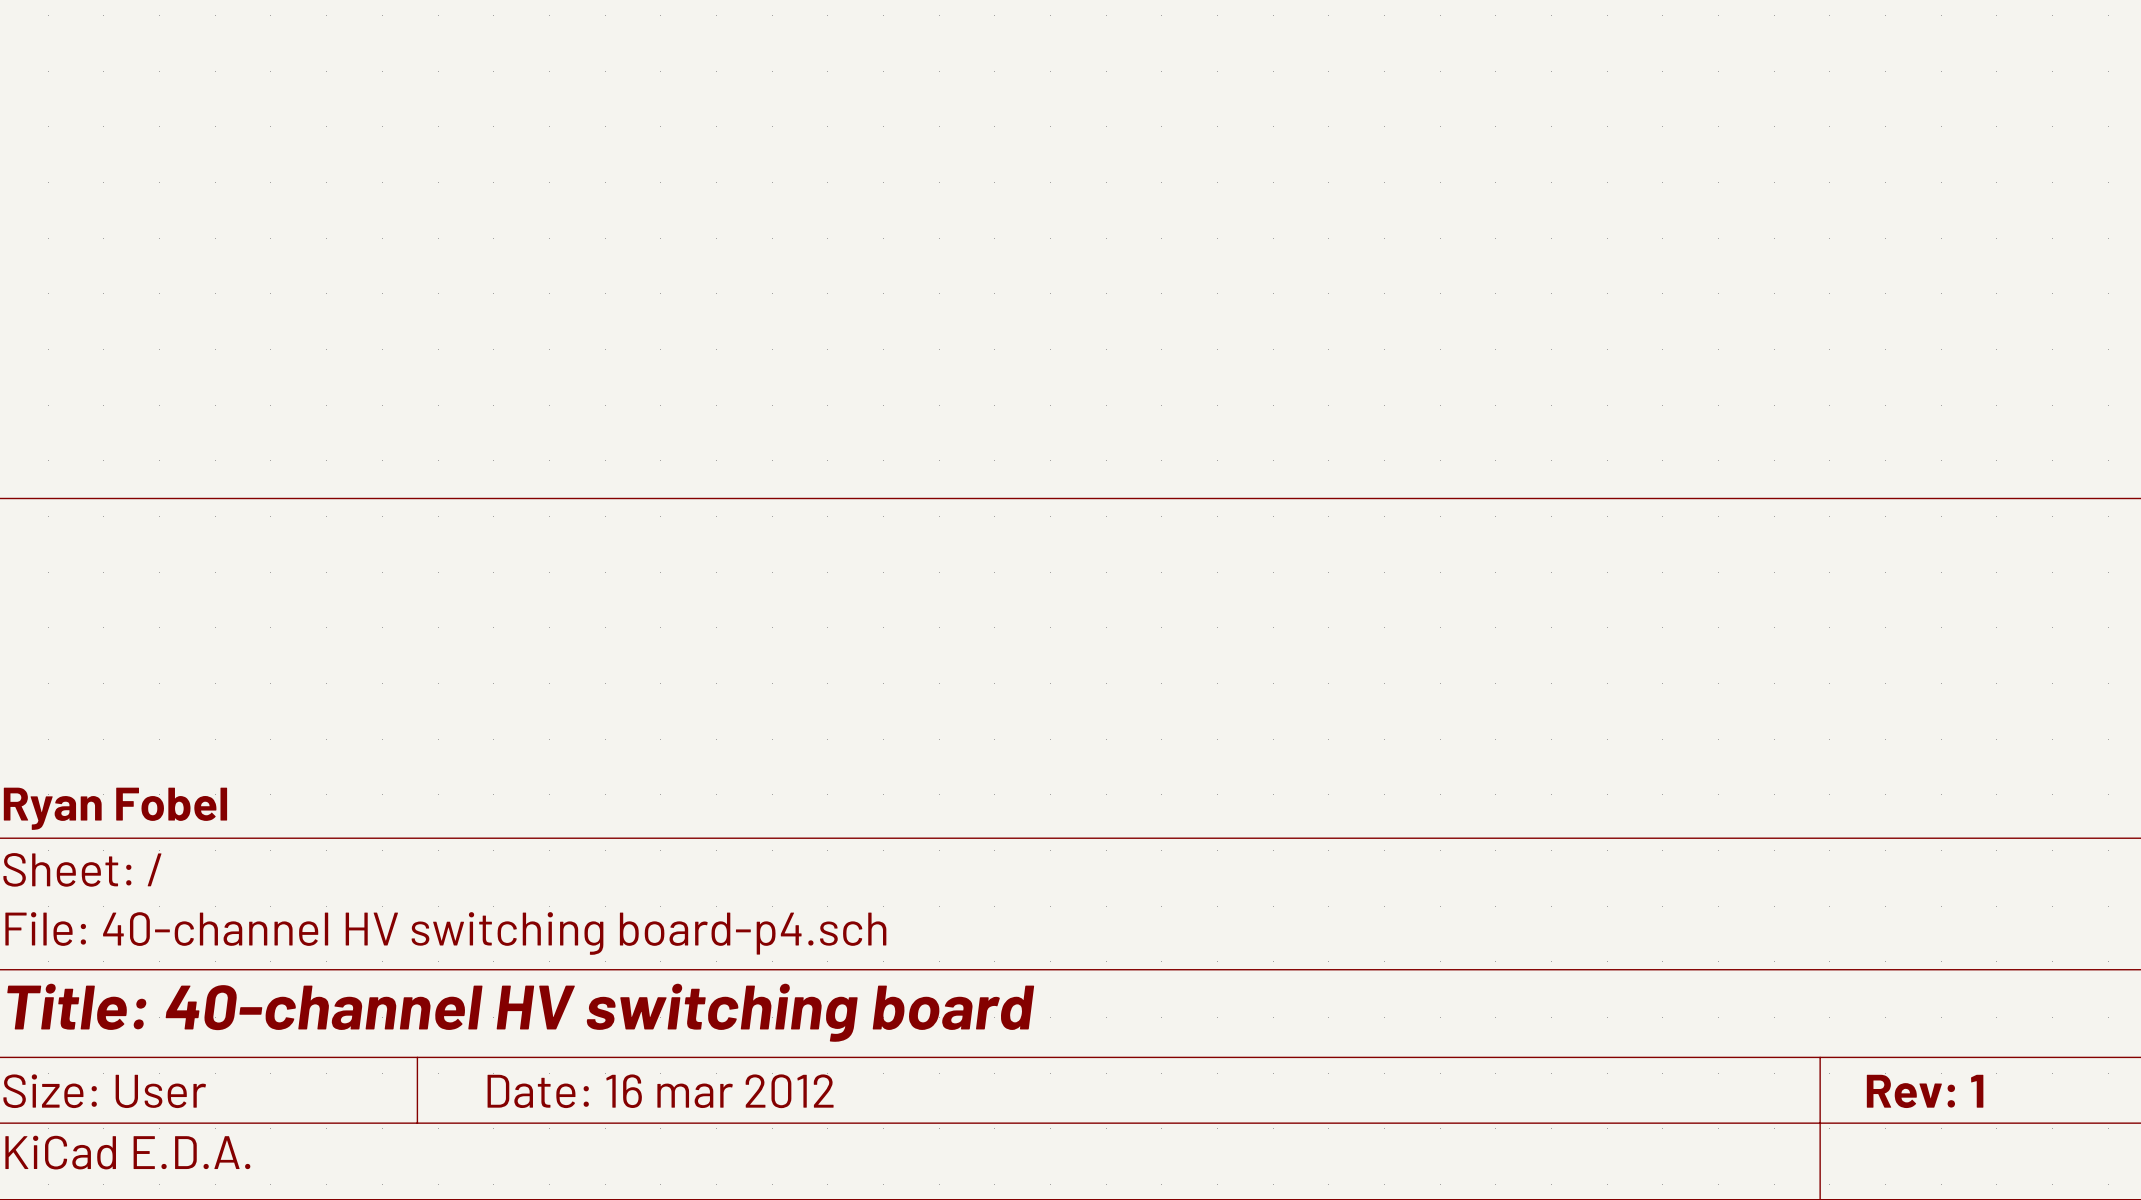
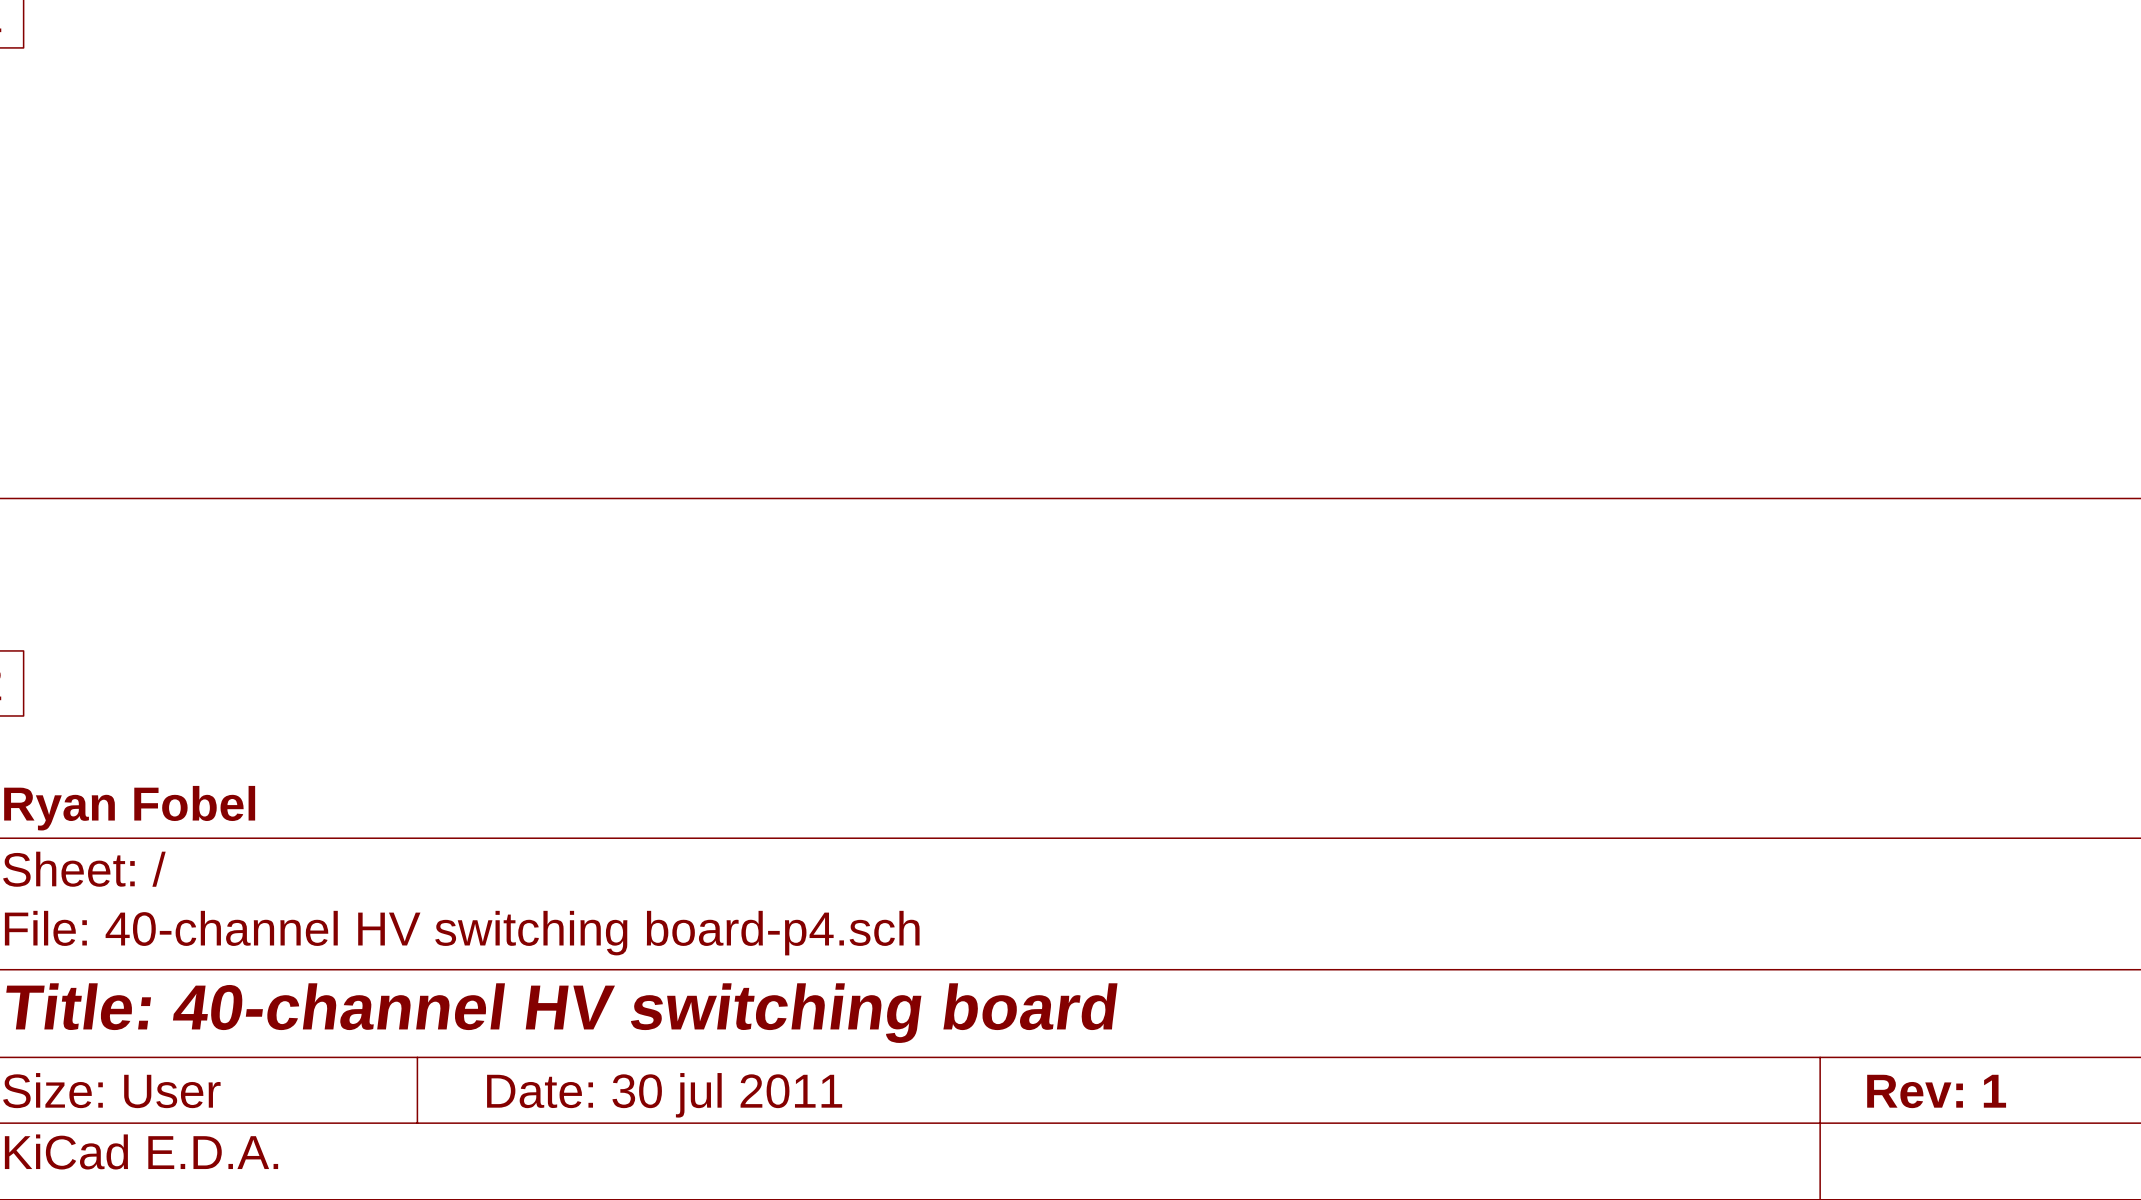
title block: Date: 16 mar 2012 (660, 1091) -> Date: 30 jul 2011 (664, 1095)

